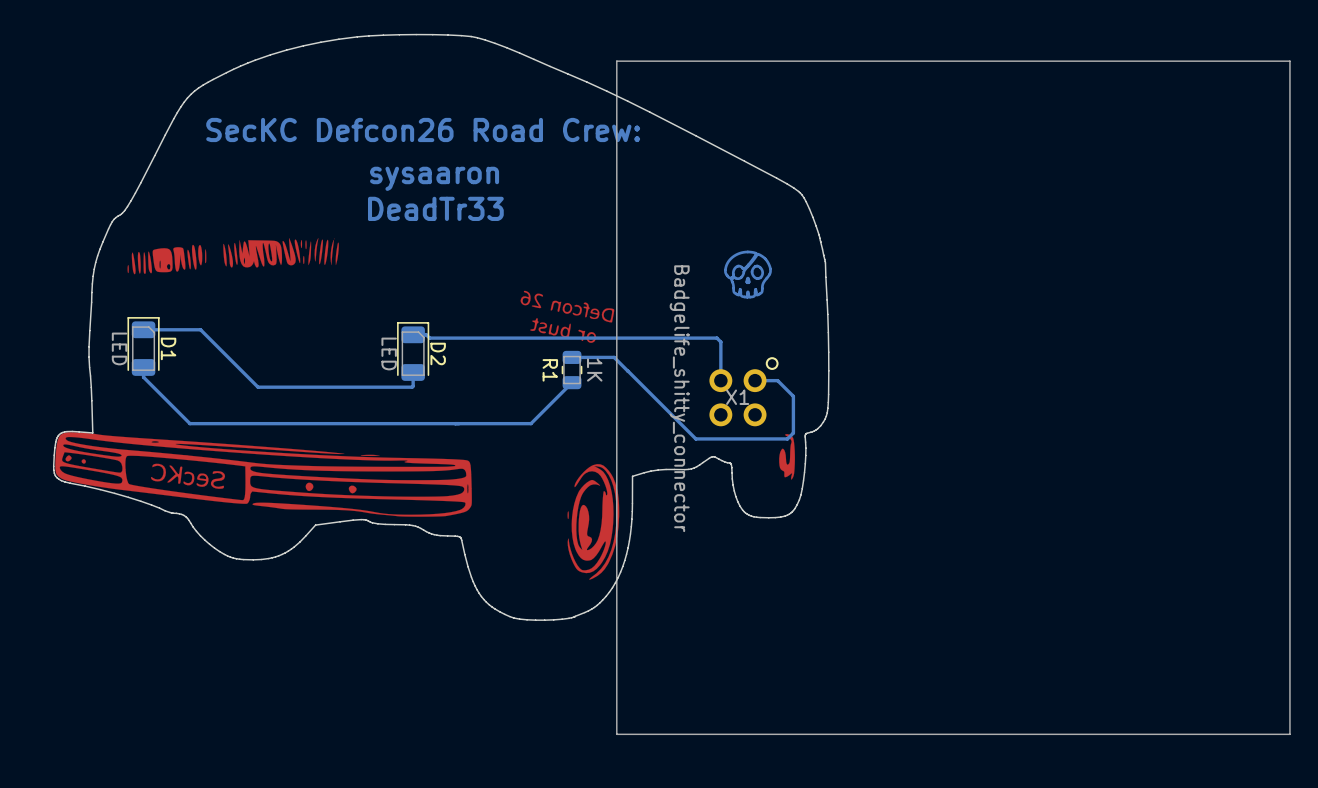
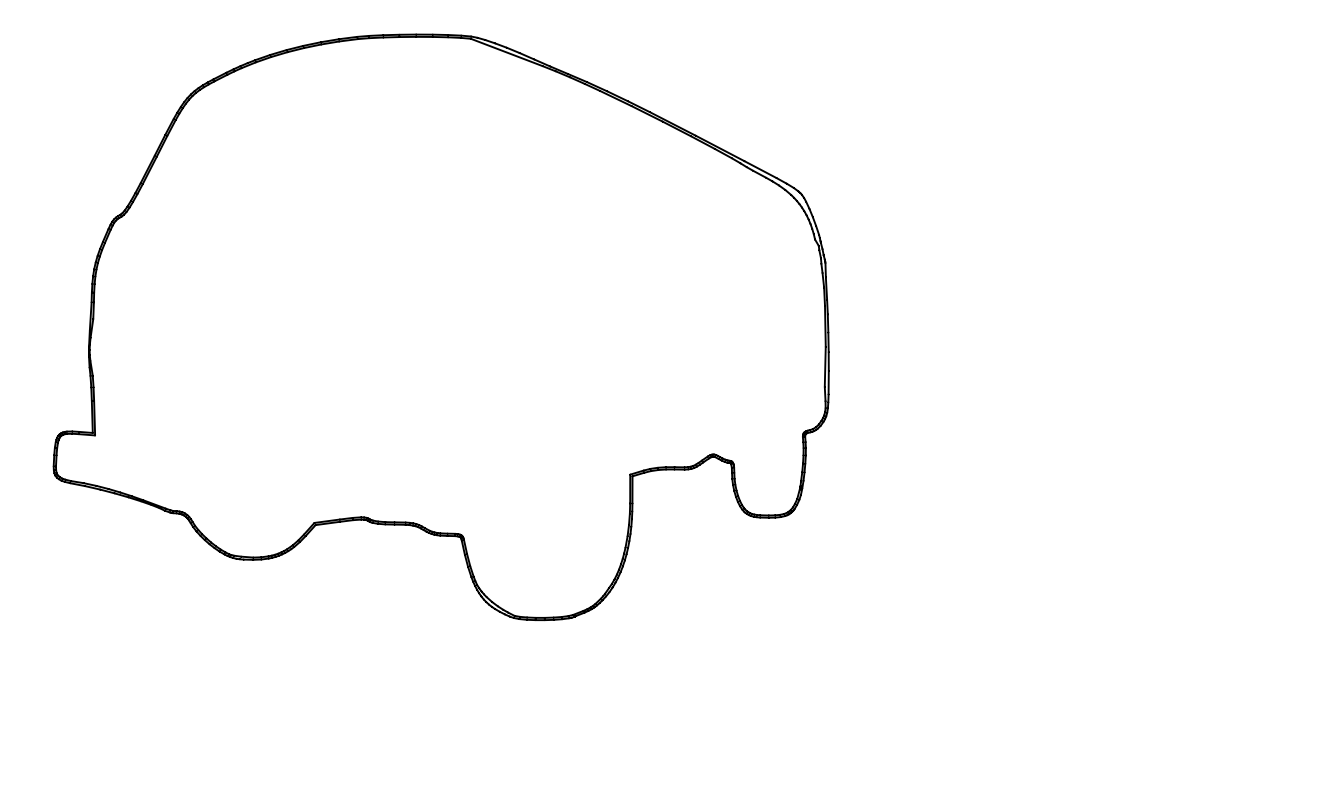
text: SecKC Defcon26 Road Crew: (423, 129) -> none
text: sysaaron (434, 178) -> none
text: DeadTr33 (435, 208) -> none
drawing: [55, 238, 795, 580] -> none
bottom track: (747, 251) (756, 253) (745, 267) (743, 268) (736, 266) (733, 270) (733, 276) (728, 277) (725, 271) (728, 261) (737, 254) (747, 251) -> none
bottom track: (757, 254) (767, 261) (770, 268) (769, 274) -> none
bottom track: (757, 254) (741, 277) (731, 279) (734, 292) (738, 295) (739, 293) -> none
bottom track: (757, 266) (762, 272) (758, 278) (754, 276) (752, 272) (753, 268) (757, 266) -> none
bottom track: (769, 274) (763, 282) (762, 291) (759, 293) (756, 294) (755, 289) (752, 296) (748, 296) (747, 291) (747, 297) (741, 296) (740, 289) (739, 292) -> none
bottom track: (747, 278) (749, 281) (747, 282) (746, 281) (747, 278) -> none
bottom track: (143, 329) (200, 329) (258, 387) (412, 387) (413, 372) -> none
bottom track: (413, 334) (426, 334) (429, 338) (716, 338) (720, 342) (720, 380) -> none
D1: LED (143, 346) -> none
D2: LED (413, 351) -> none
bottom track: (572, 357) (614, 357) (627, 371) -> none
bottom track: (143, 367) (143, 377) (189, 423) (531, 423) (572, 382) -> none
R1: 1K (572, 370) -> none
bottom track: (627, 371) (695, 438) (787, 438) (793, 433) (793, 396) (777, 380) (755, 380) -> none
X1: Badgelife_shitty_connector (953, 397) -> none
board edge: none -> (800, 485) (800, 486) (797, 498) (789, 511) (780, 514) (760, 515) (748, 512) (742, 505) (736, 490) (732, 462) (715, 454) (710, 455) (690, 466) (657, 467) (630, 474) (627, 536) (620, 564) (611, 583) (595, 603) (583, 610) (568, 616) (535, 617) (514, 615) (497, 606) (484, 594) (475, 580) (463, 538) (460, 534) (434, 532) (413, 523) (352, 517) (314, 522) (292, 545) (275, 554) (253, 557) (233, 555) (211, 542) (185, 513) (108, 488) (62, 478) (57, 474) (56, 466) (58, 442) (61, 436) (72, 433) (95, 435) (93, 387) (89, 349) (95, 276) (102, 250) (114, 222) (123, 214) (133, 201) (175, 120) (189, 99) (204, 87) (241, 68) (271, 57) (303, 48) (369, 38) (448, 37) (470, 38) (555, 71) (600, 90) (731, 158) (779, 185) (799, 204) (808, 219) (818, 245) (824, 287) (825, 346) (825, 412) (818, 424) (803, 434) (803, 455) (800, 489) (800, 486)

